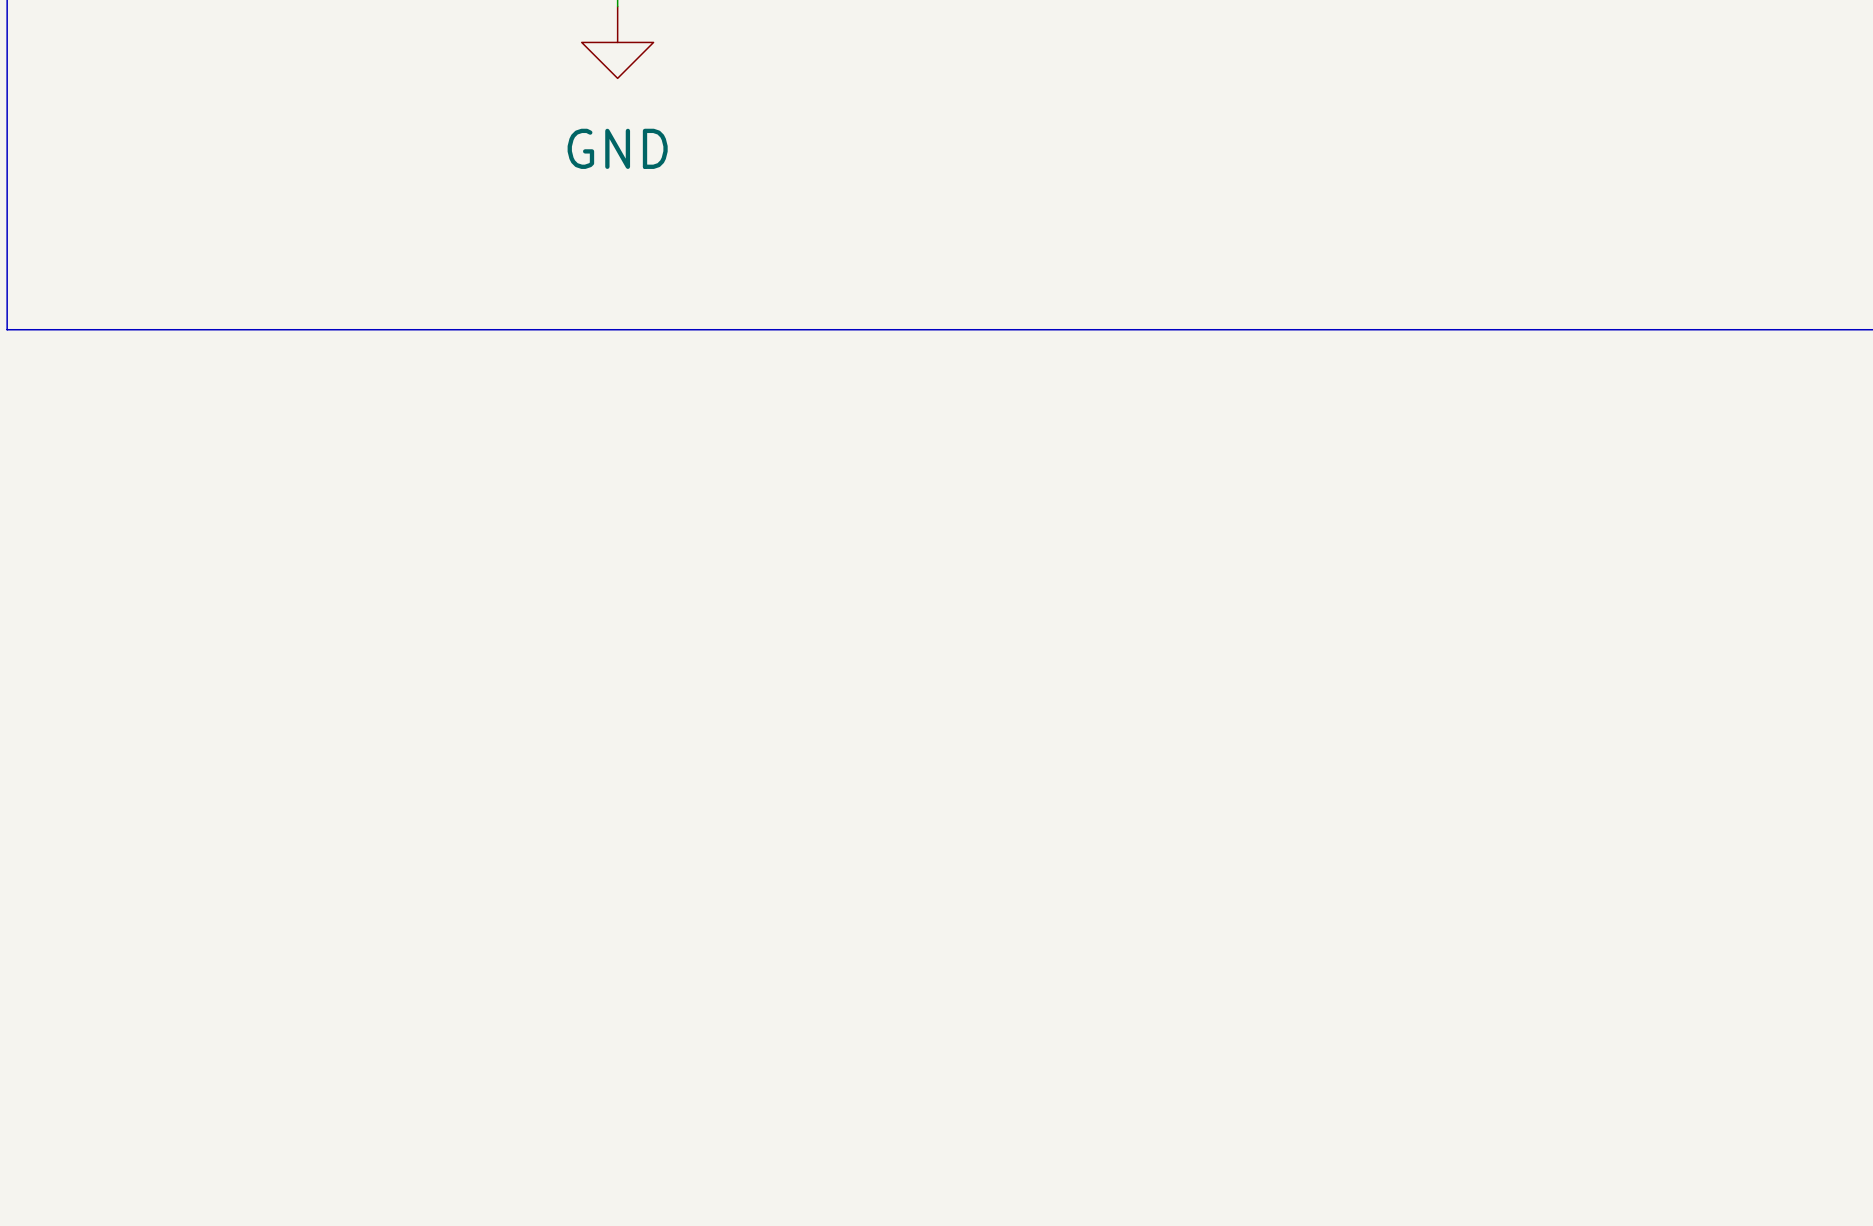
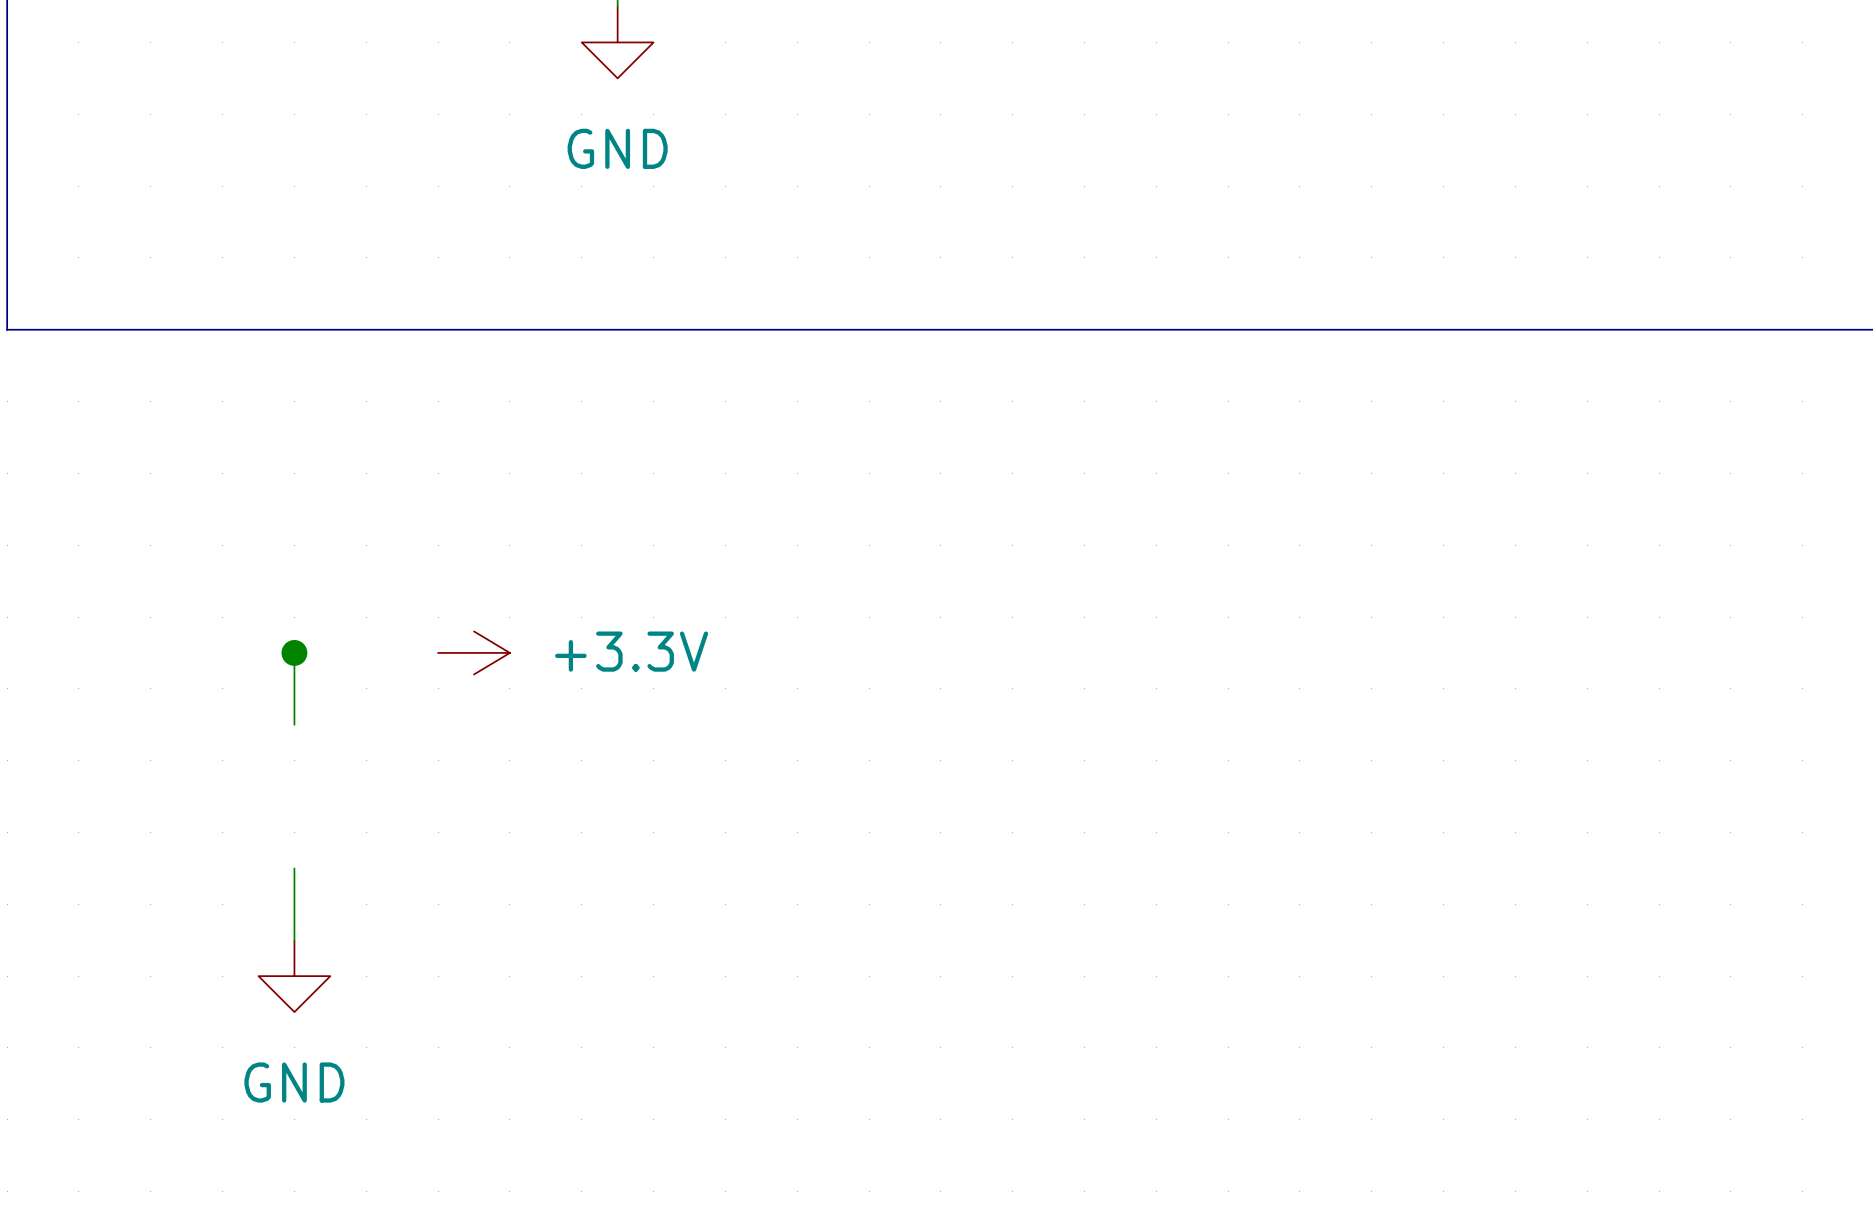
wire: none -> (294, 652) (294, 724)
junction: none -> (294, 652)
power symbol: none -> +3.3V (474, 652)
wire: none -> (294, 868) (294, 940)
power symbol: none -> GND (294, 976)

